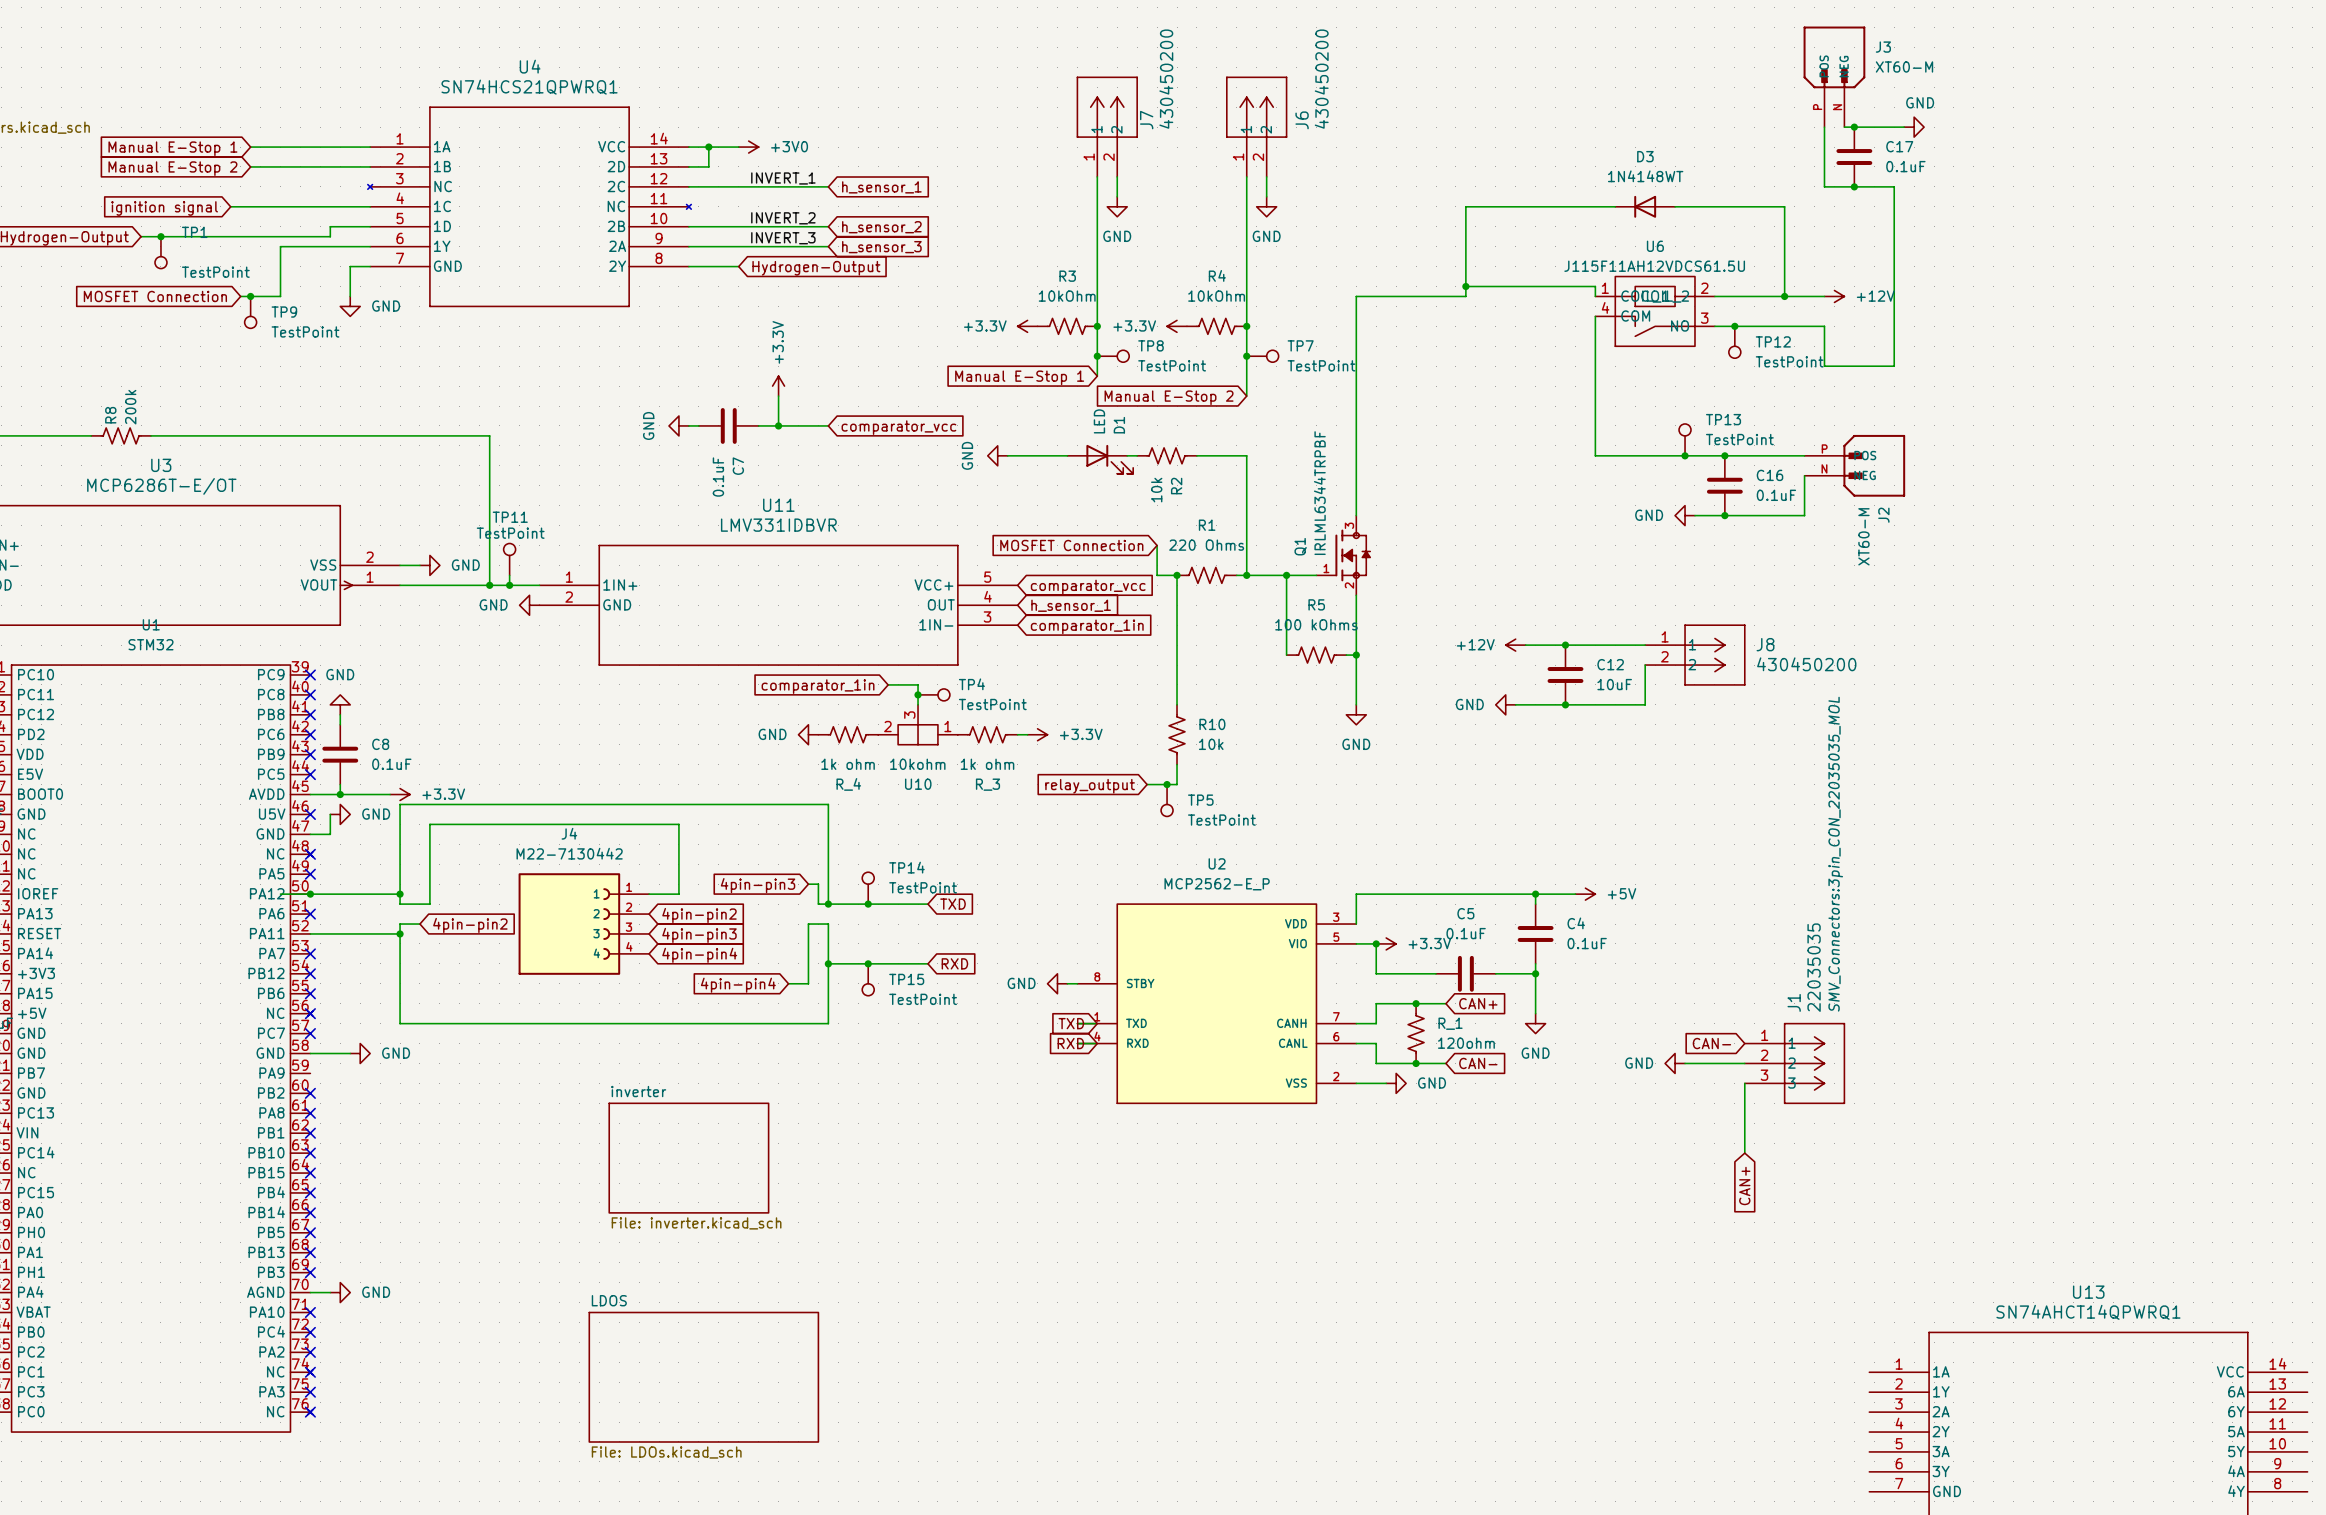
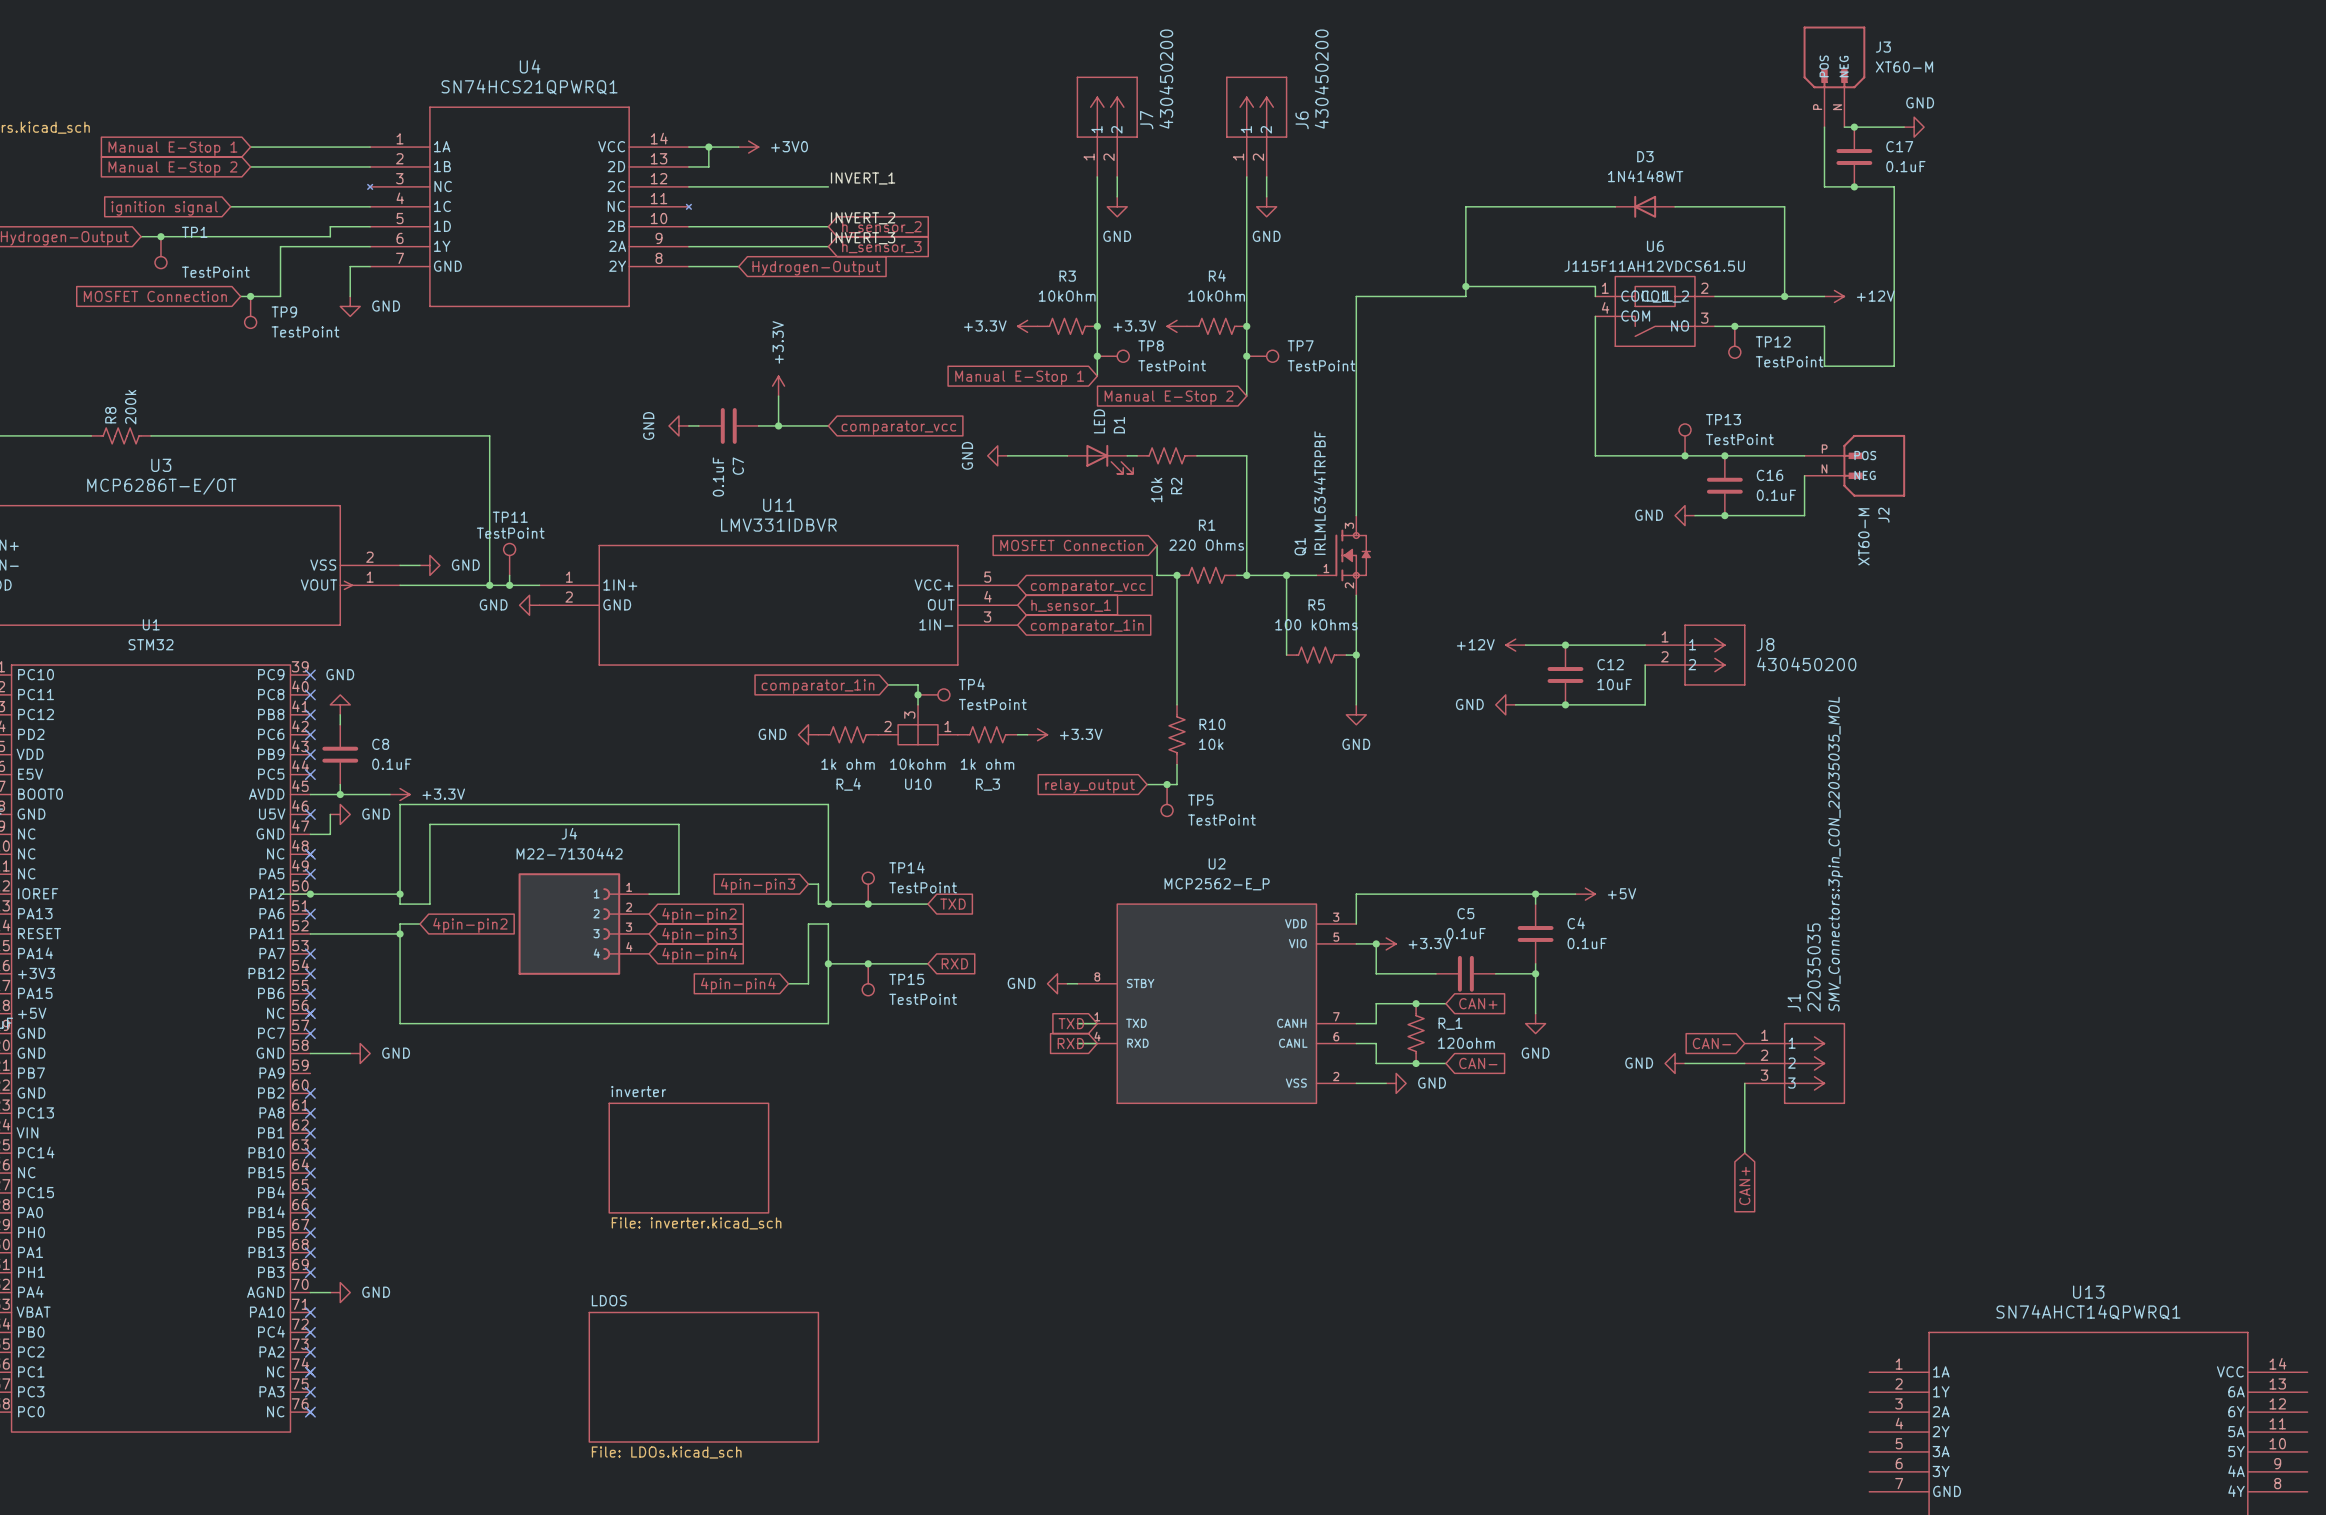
label position: INVERT_1 (783, 178) -> INVERT_1 (863, 178)
global label: h_sensor_1 (881, 187) -> none
label position: INVERT_2 (783, 218) -> INVERT_2 (863, 218)
label position: INVERT_3 (783, 238) -> INVERT_3 (863, 238)

